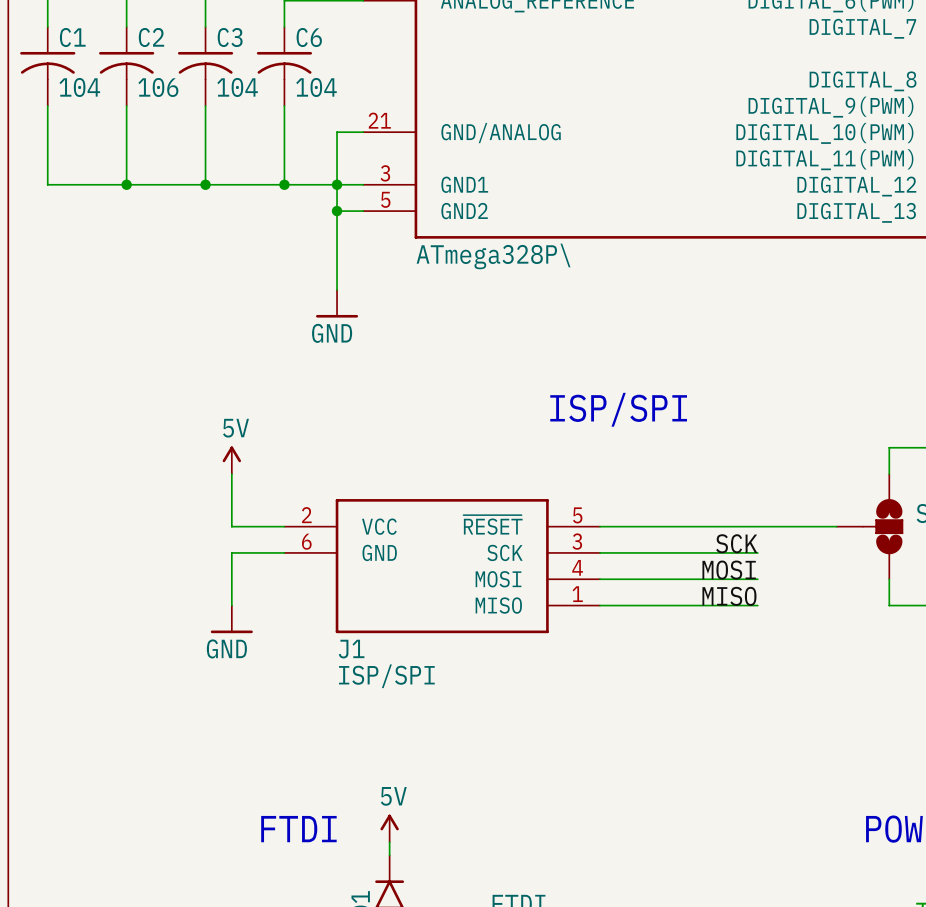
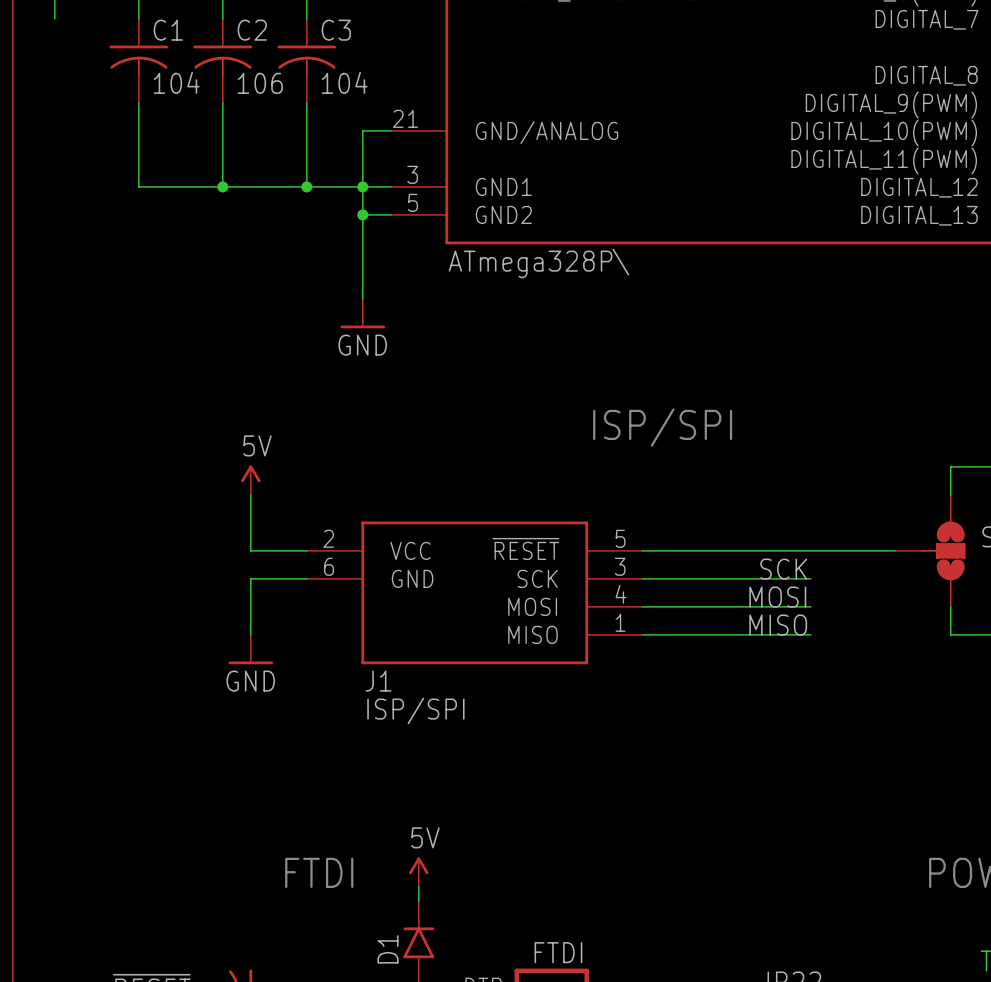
C2 name: C2 (151, 37) -> C1 (168, 30)
C3 name: C3 (230, 37) -> C2 (252, 30)
C6 name: C6 (309, 37) -> C3 (336, 30)
C1: 104 (47, 66) -> none
C2 value: 106 (158, 87) -> 104 (176, 82)
C3 value: 104 (237, 87) -> 106 (260, 83)
wire: (47, 105) (47, 184) (126, 184) -> none
junction: (126, 184) -> none

